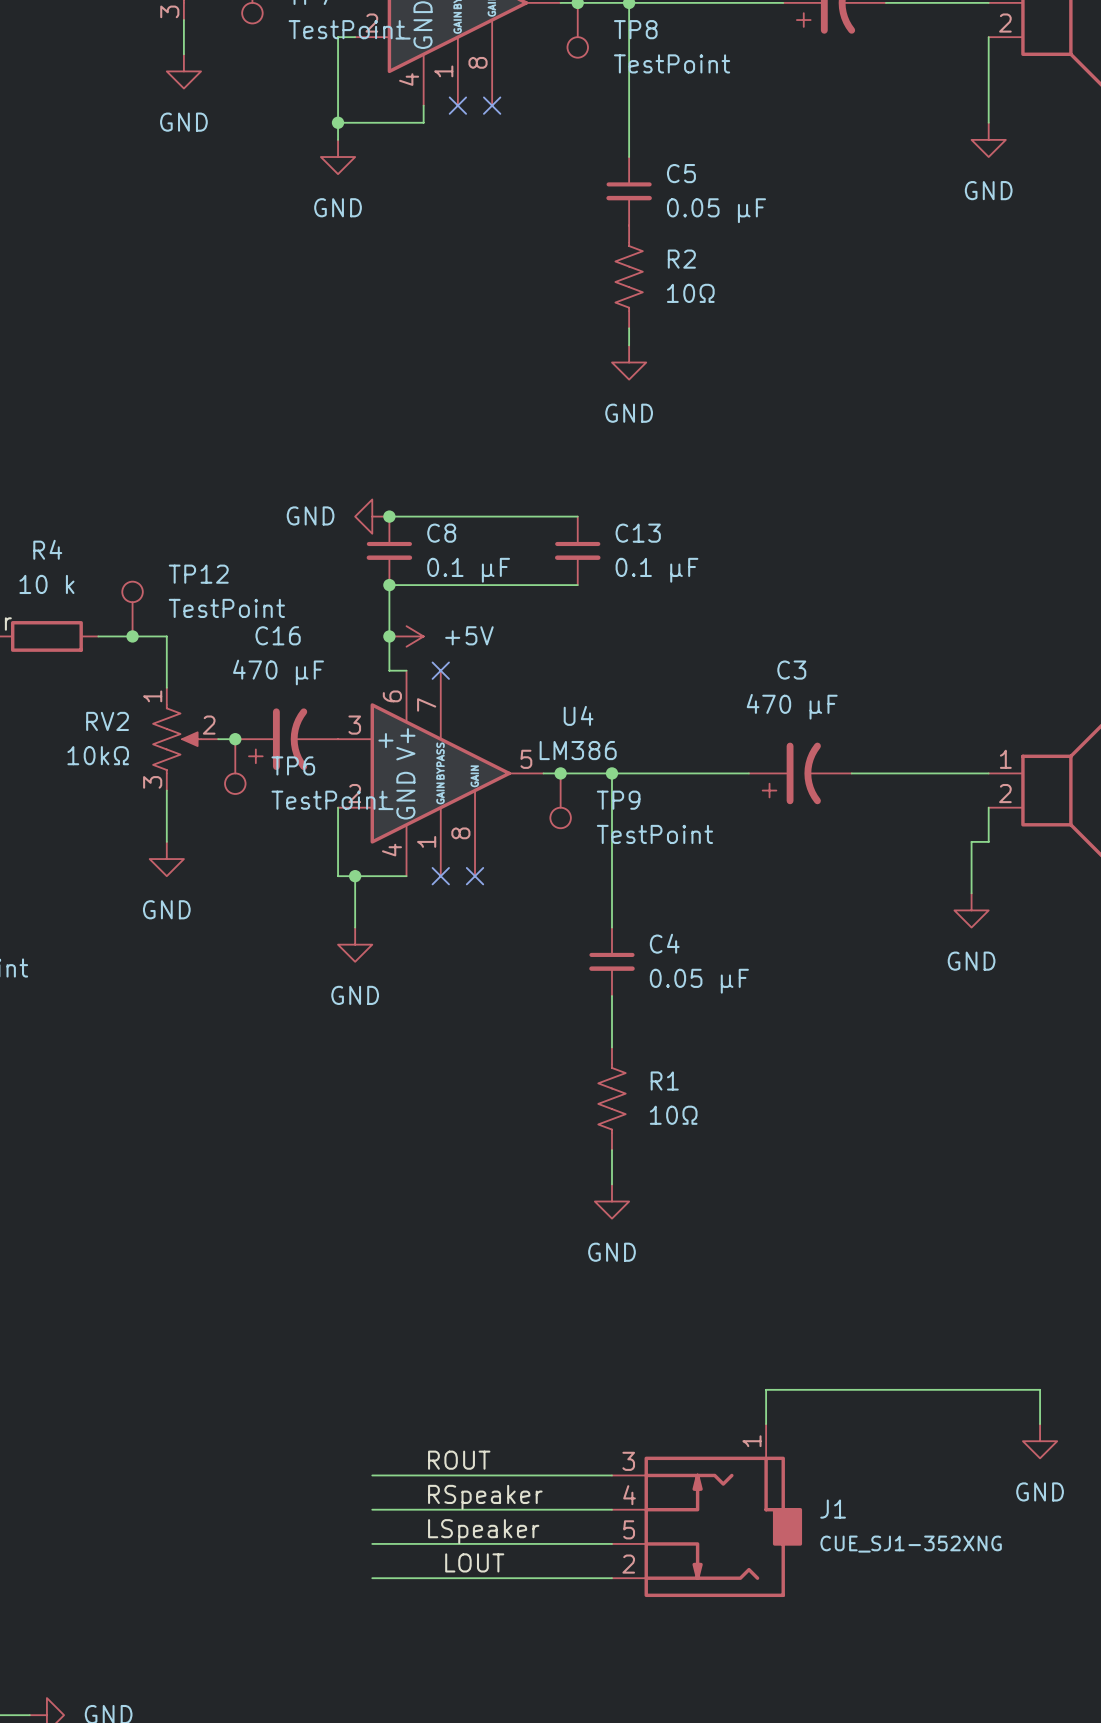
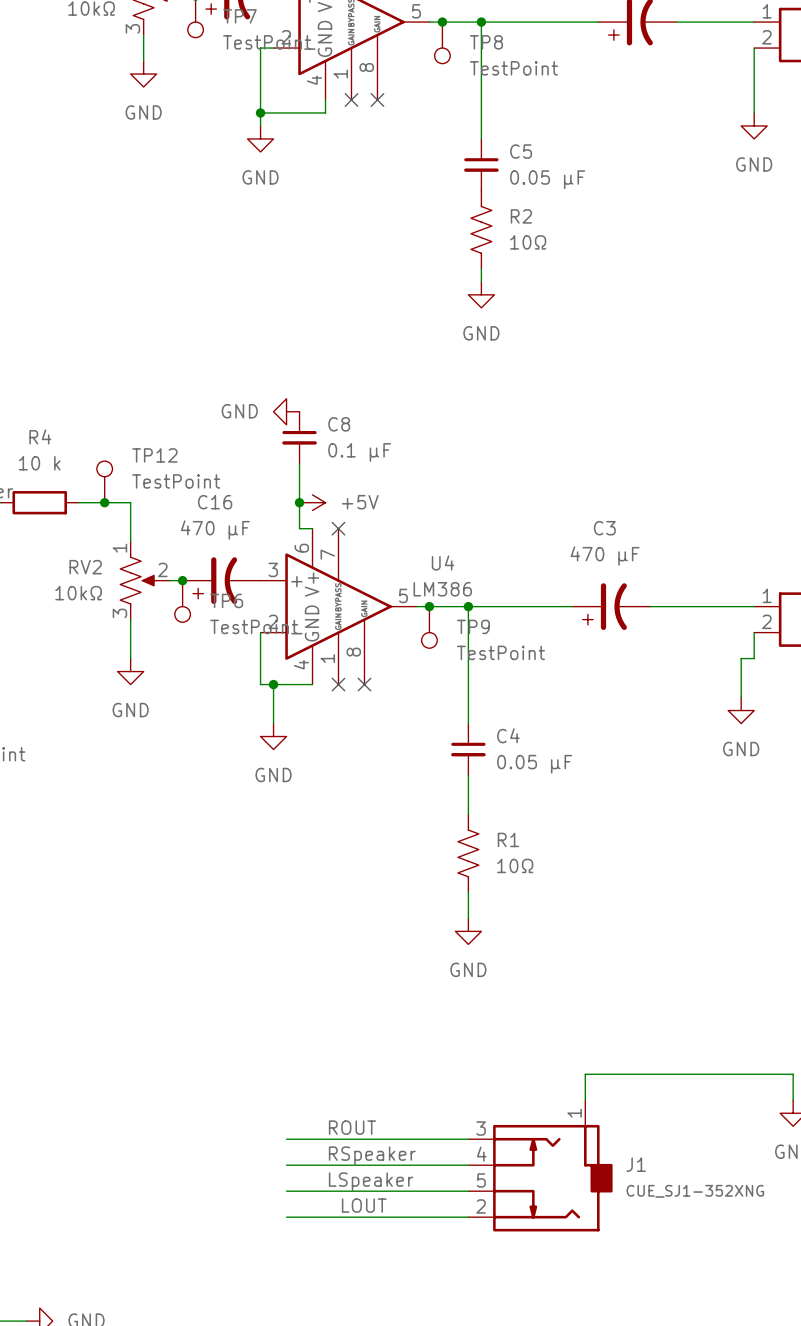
wire: (389, 516) (577, 516) -> none
junction: (389, 516) -> none
C13: 0.1 µF (577, 550) -> none
wire: (389, 585) (577, 585) -> none
junction: (389, 585) -> none

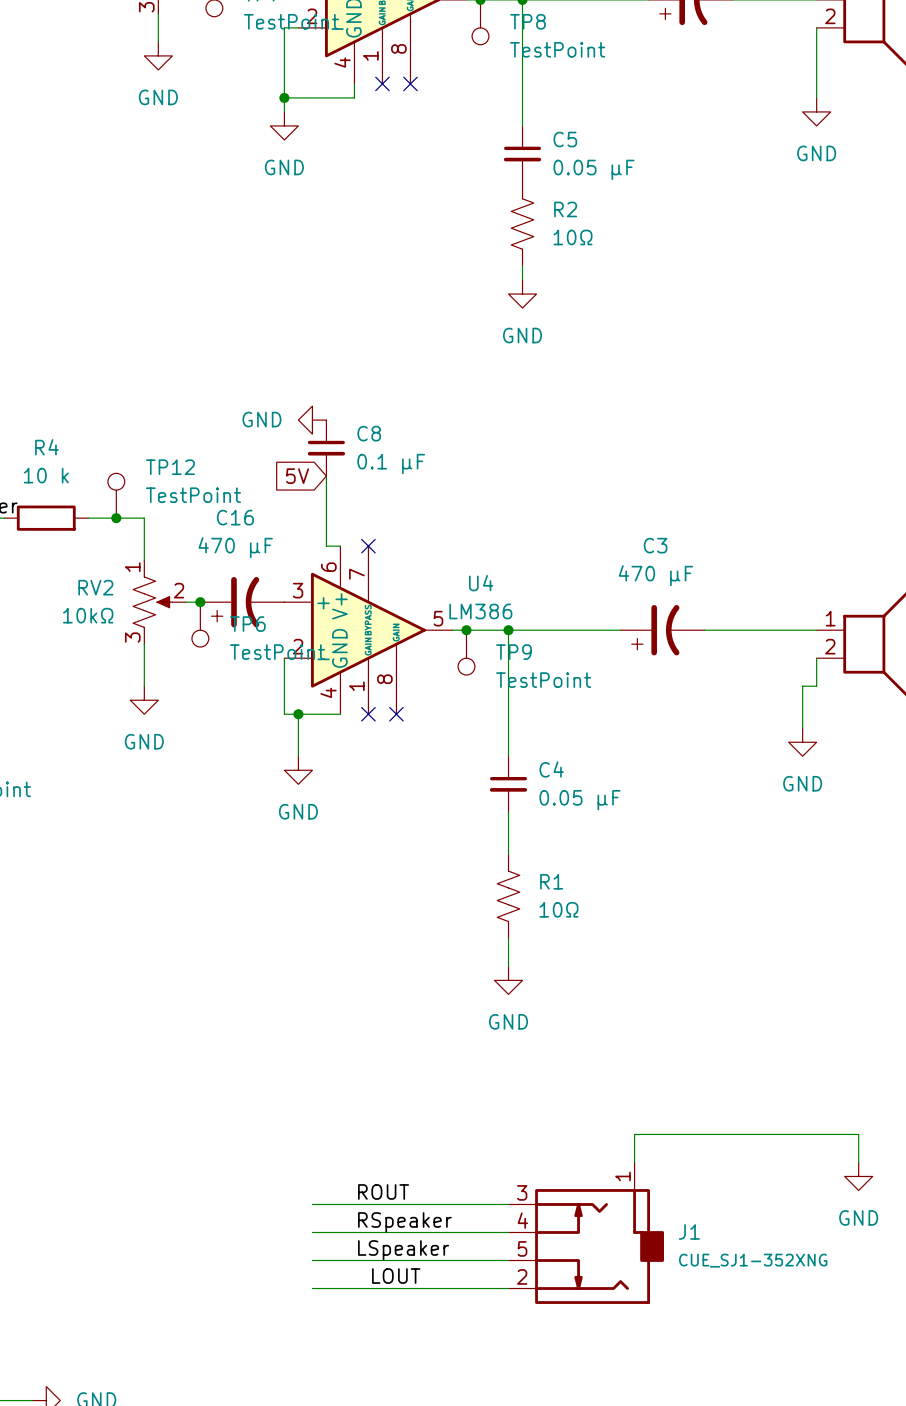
global label: none -> 5V (297, 476)
junction: (299, 502) -> none
power symbol: +5V (312, 502) -> none

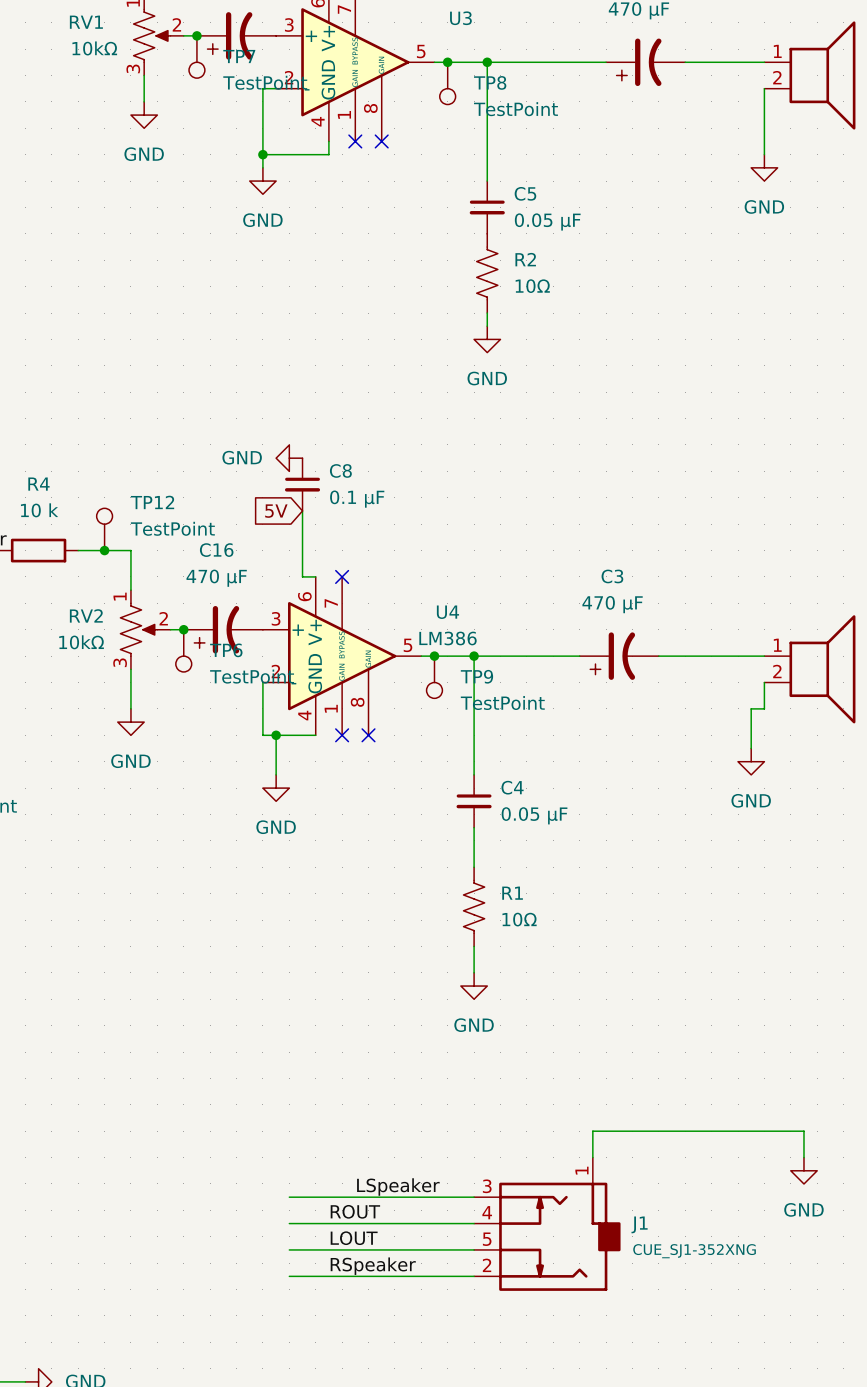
label: ROUT (383, 1191) -> none
label: none -> LSpeaker (398, 1187)
label: RSpeaker (404, 1222) -> ROUT (355, 1211)
label: LSpeaker (403, 1250) -> LOUT (354, 1238)
label: LOUT (396, 1276) -> none
label: none -> RSpeaker (373, 1266)

